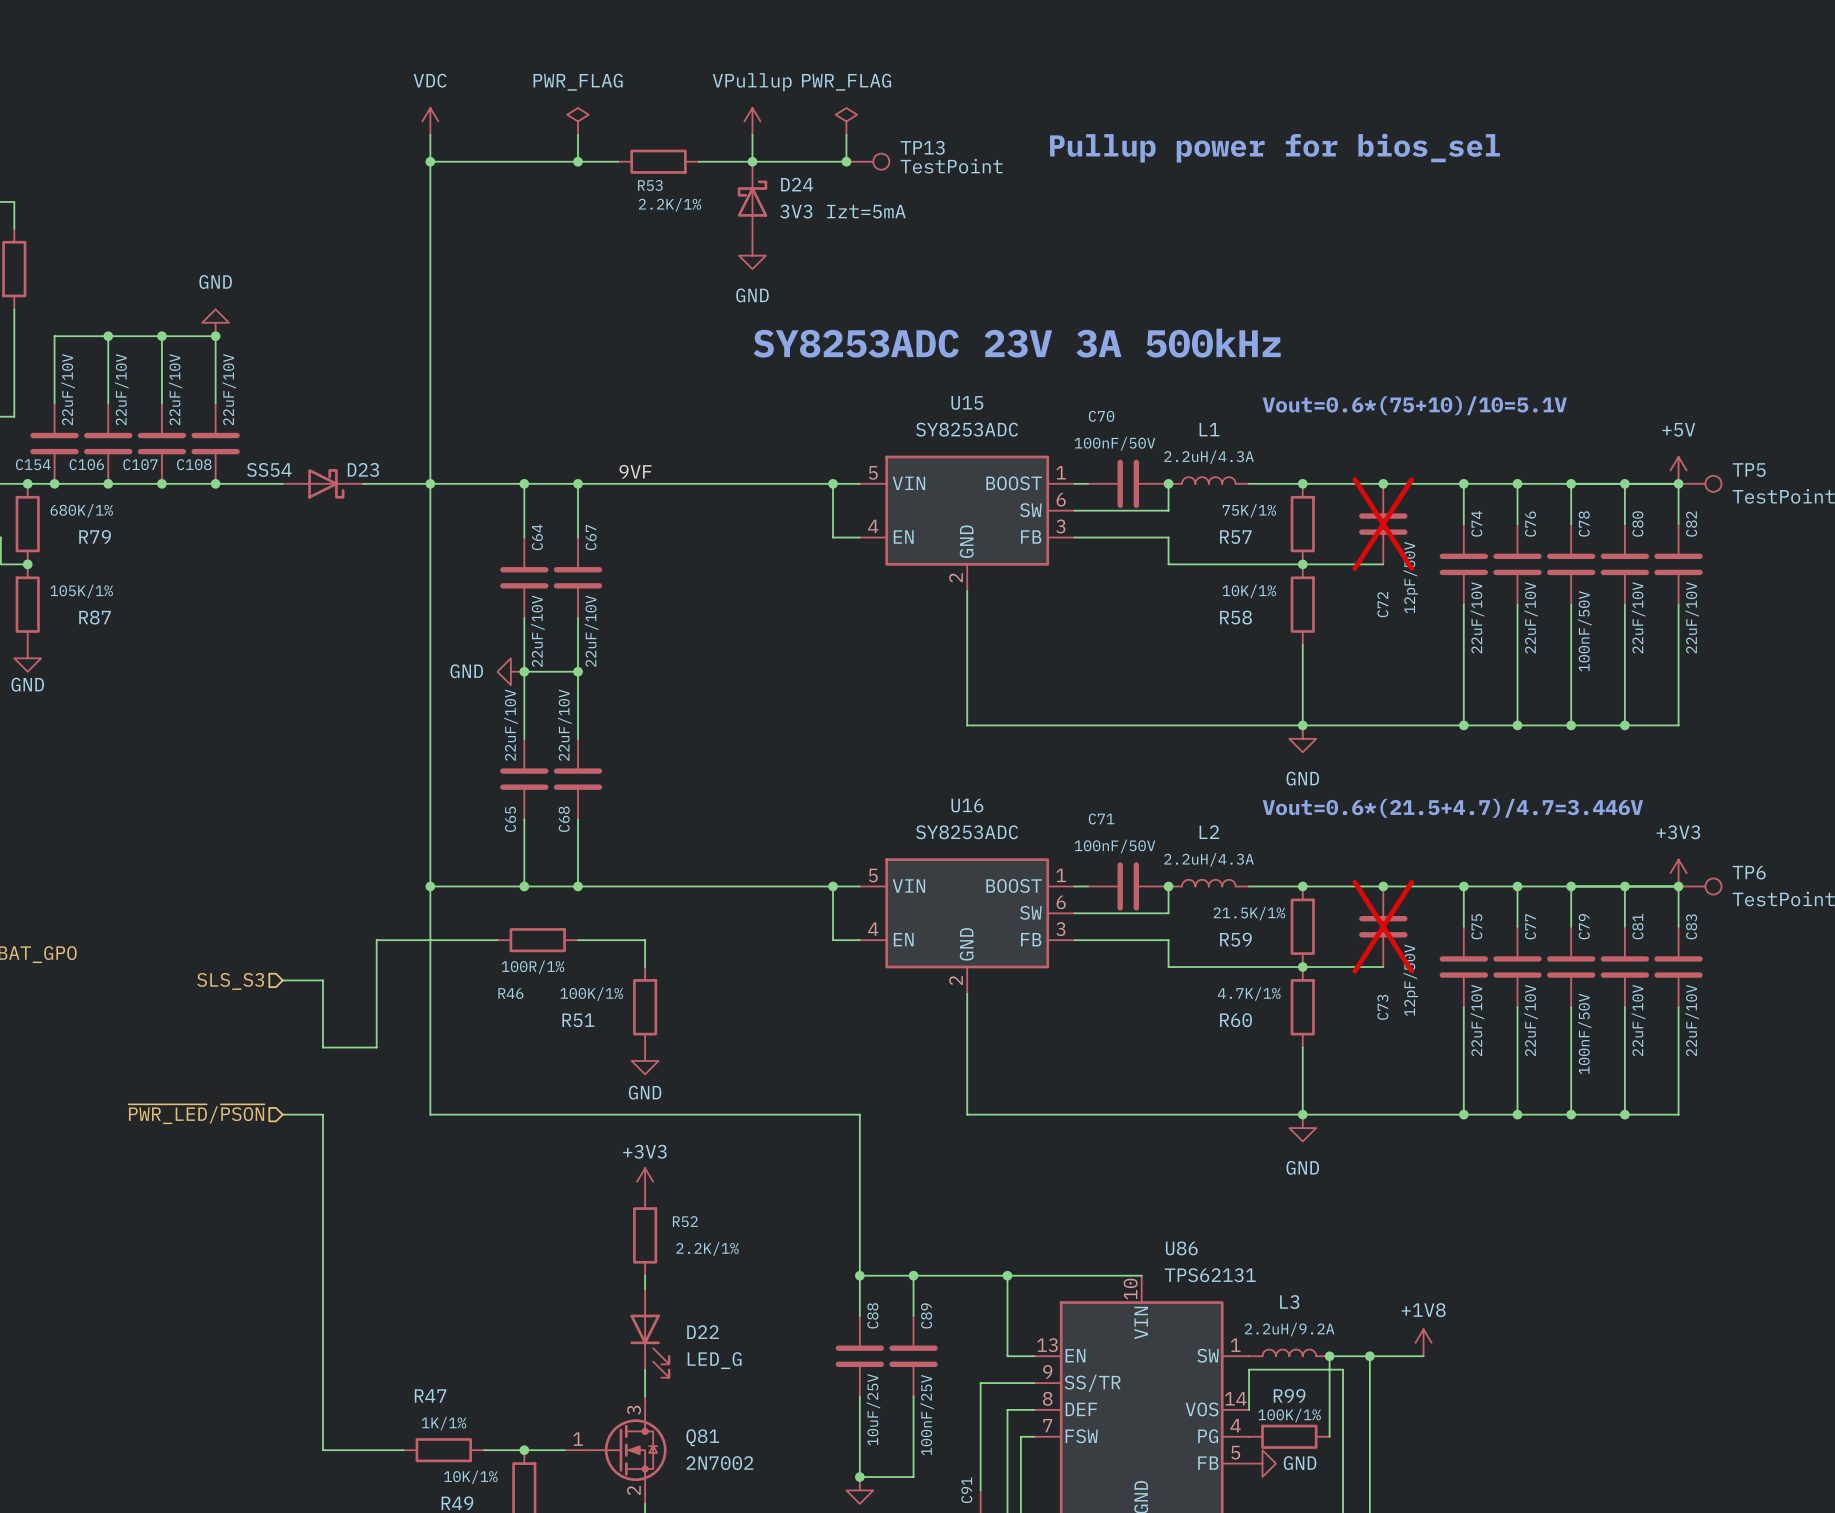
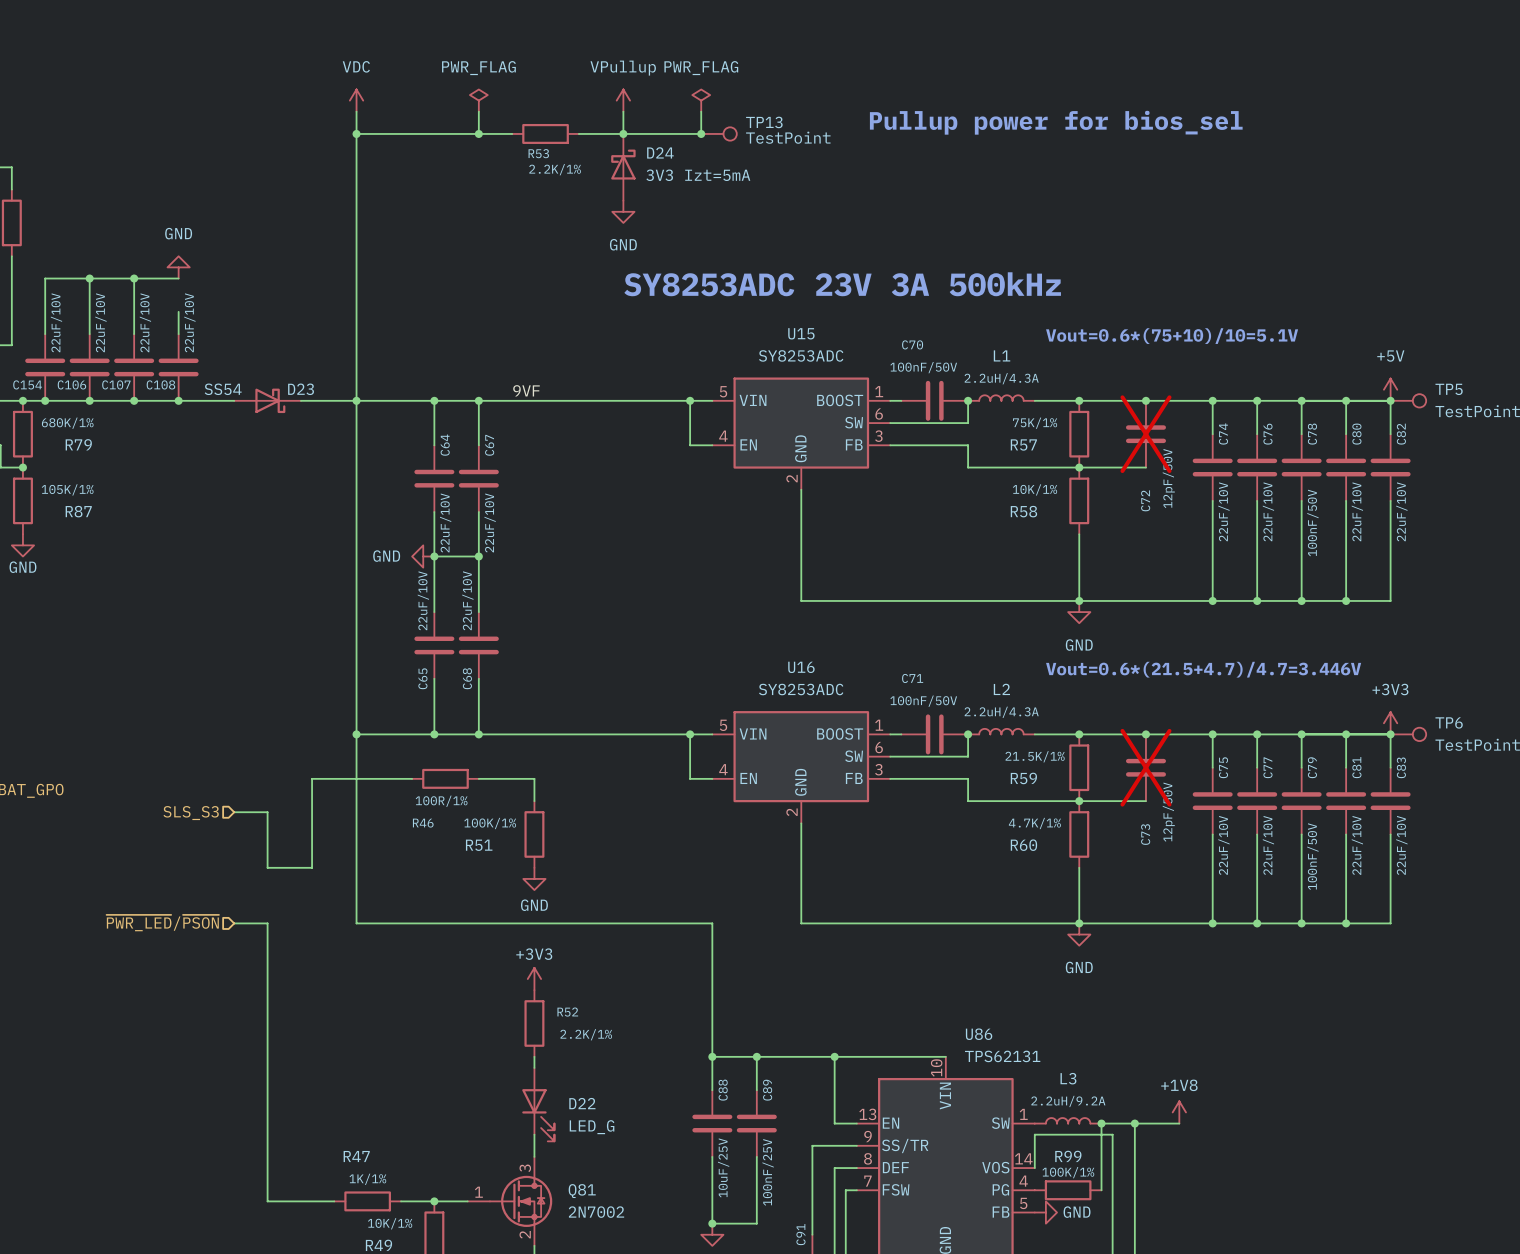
wire: (215, 336) (215, 376) -> none
junction: (215, 336) -> none

